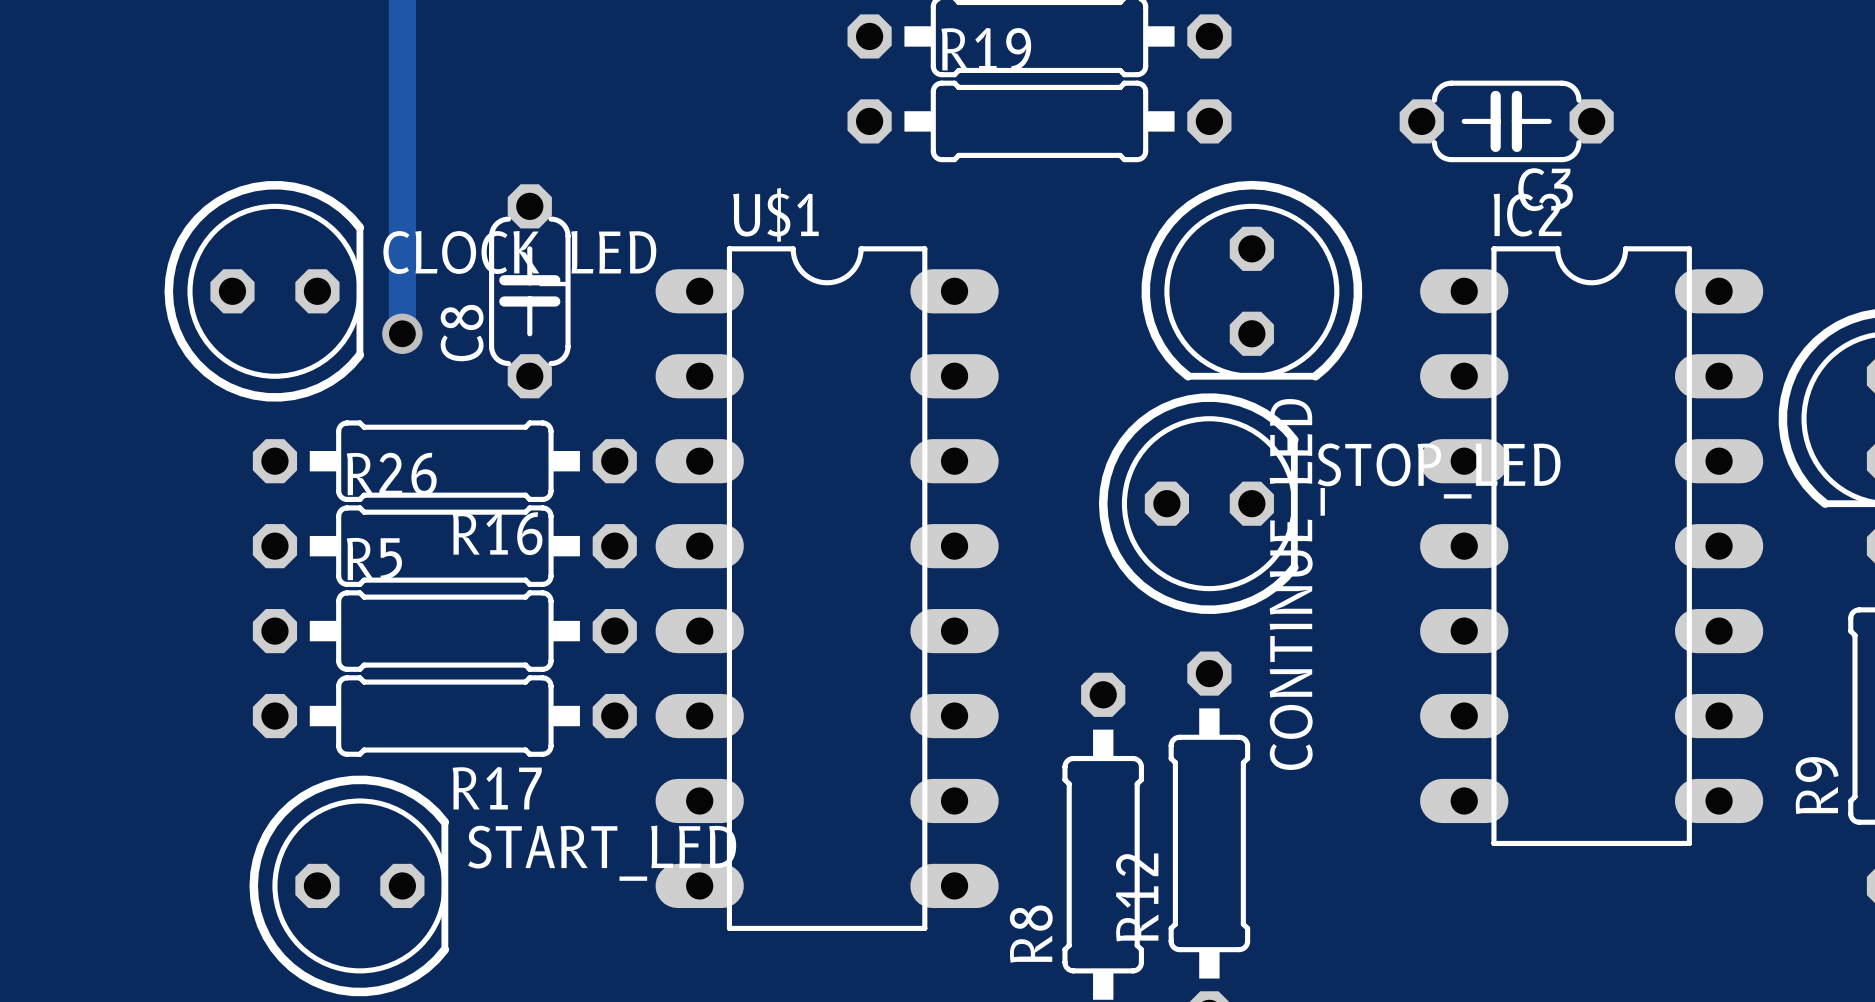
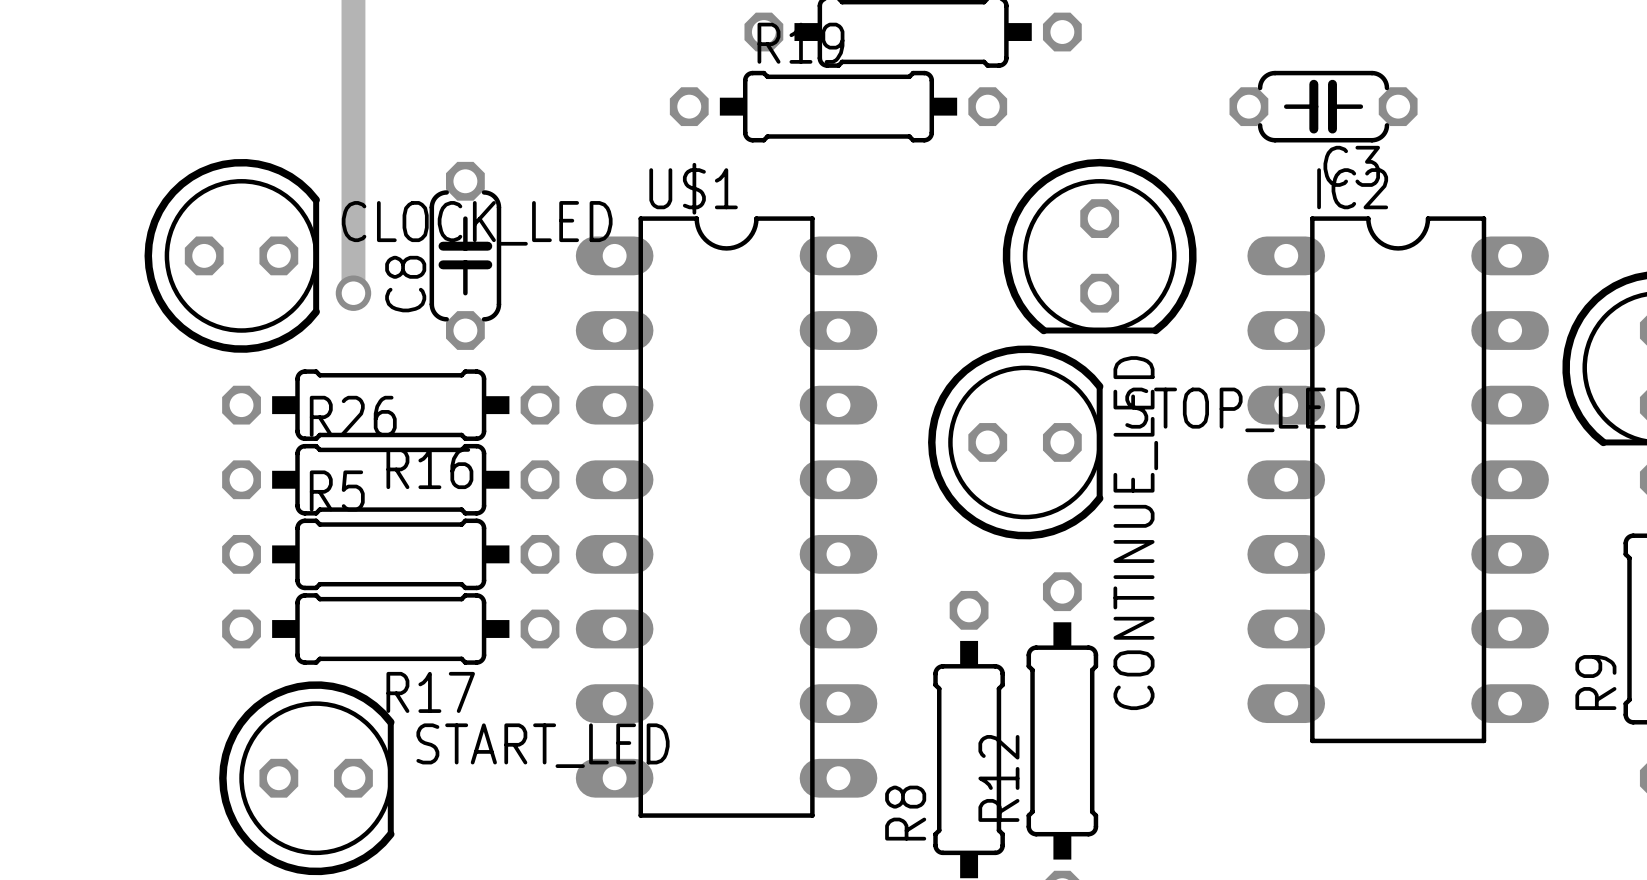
R19 position: (1039, 121) -> (838, 106)
STOP_LED position: (1198, 503) -> (1015, 442)

